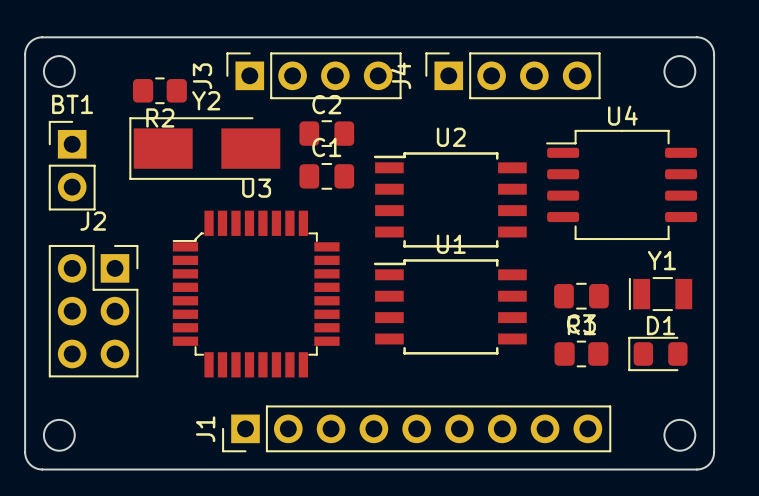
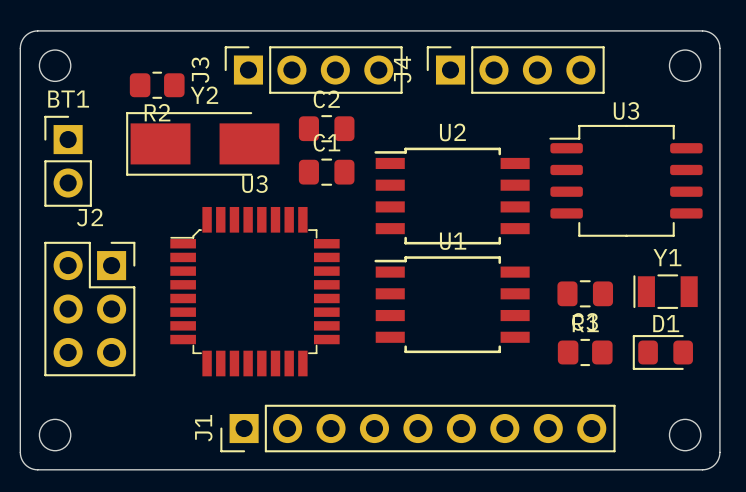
U4 name: U4 (622, 115) -> U3 (626, 110)

